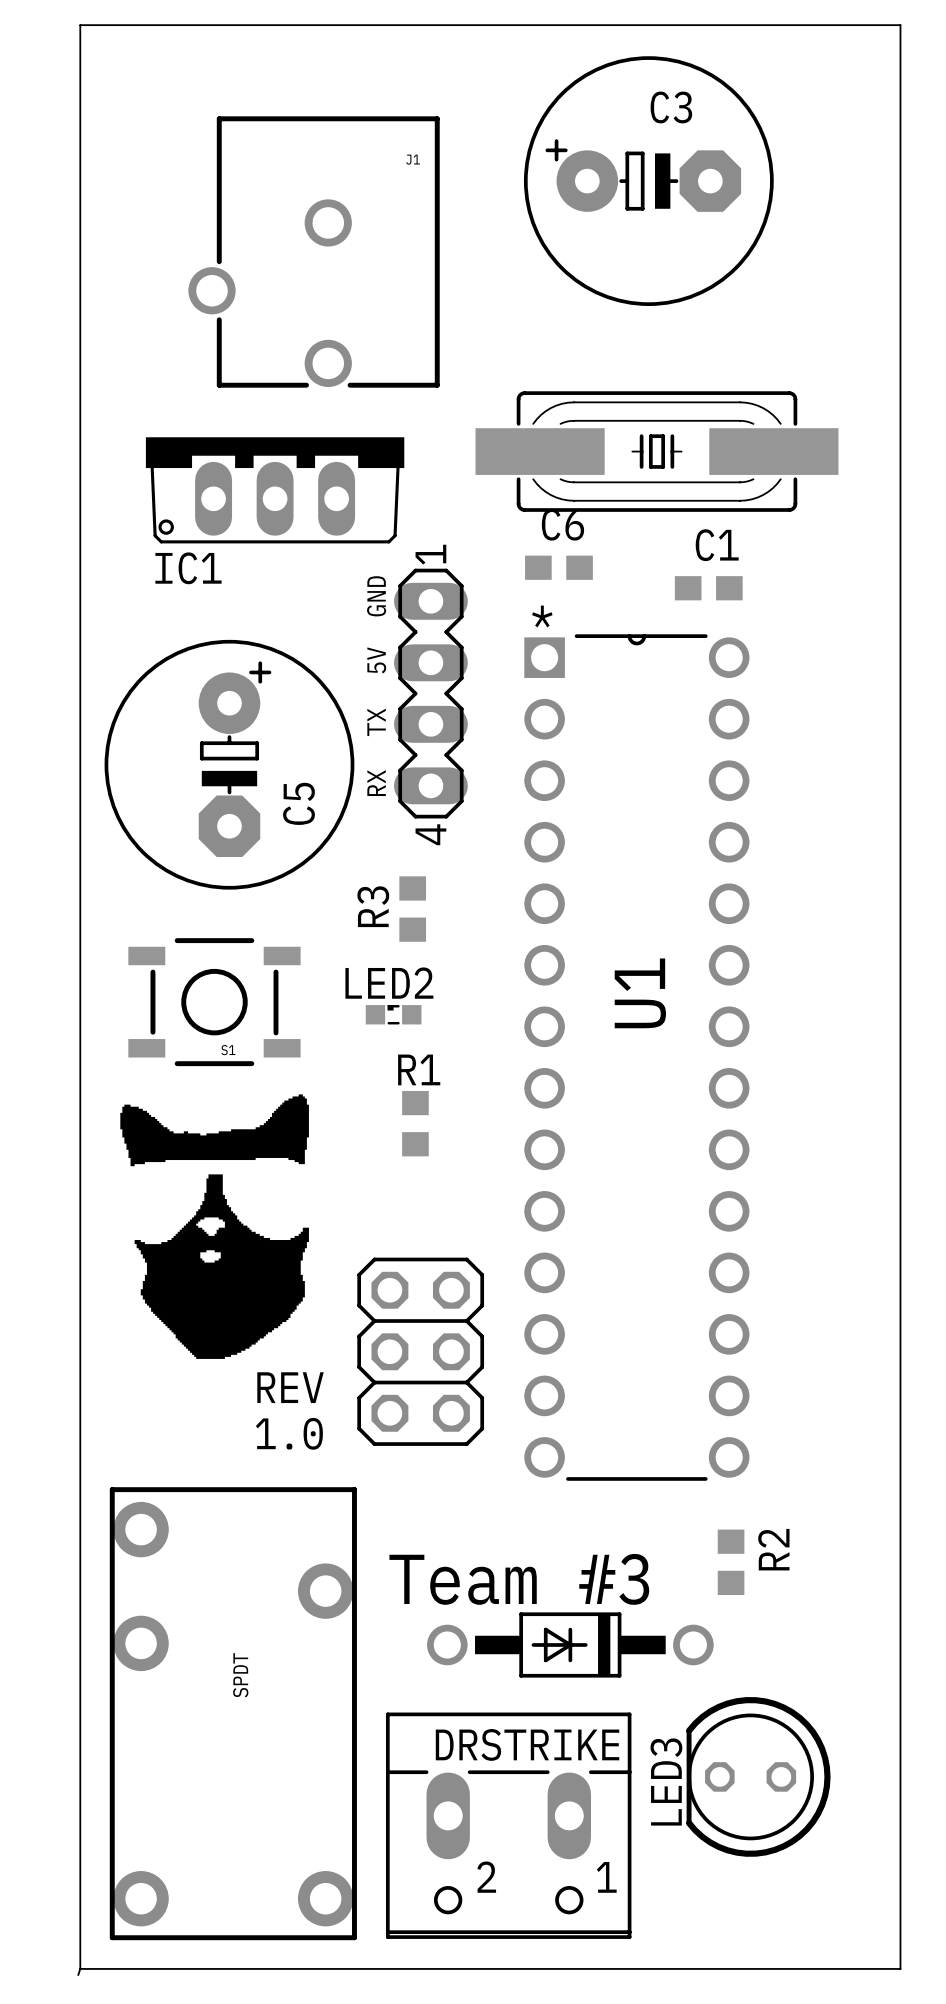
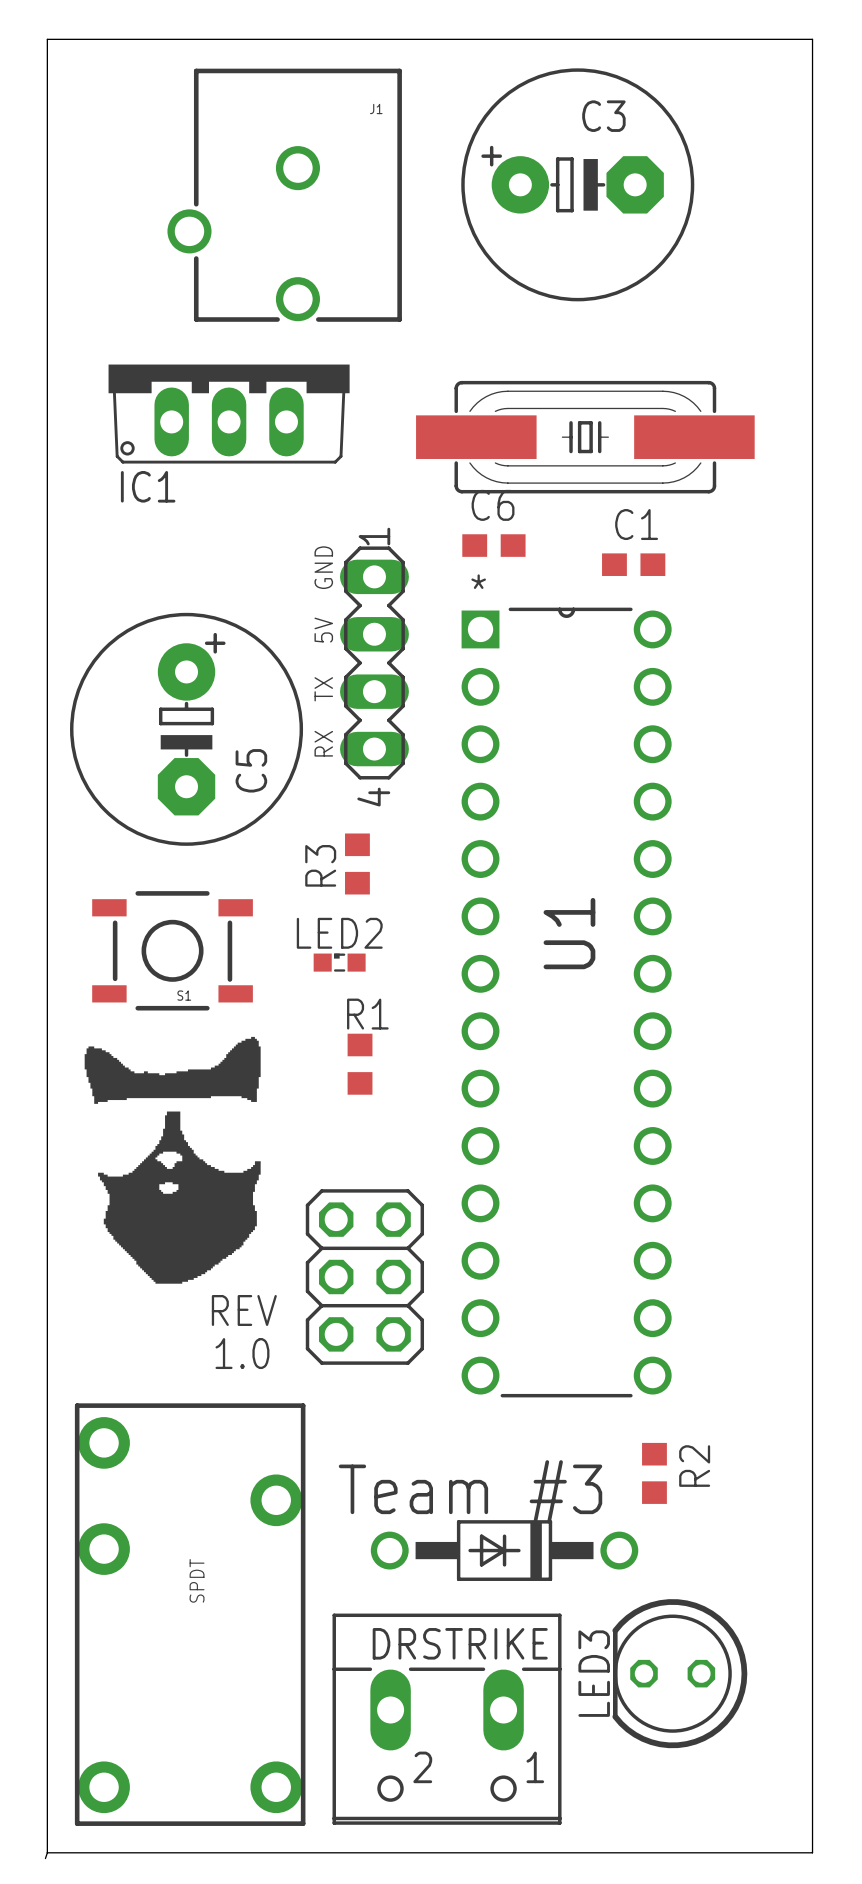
J1 position: (314, 252) -> (284, 195)
IC1 position: (275, 490) -> (229, 414)

